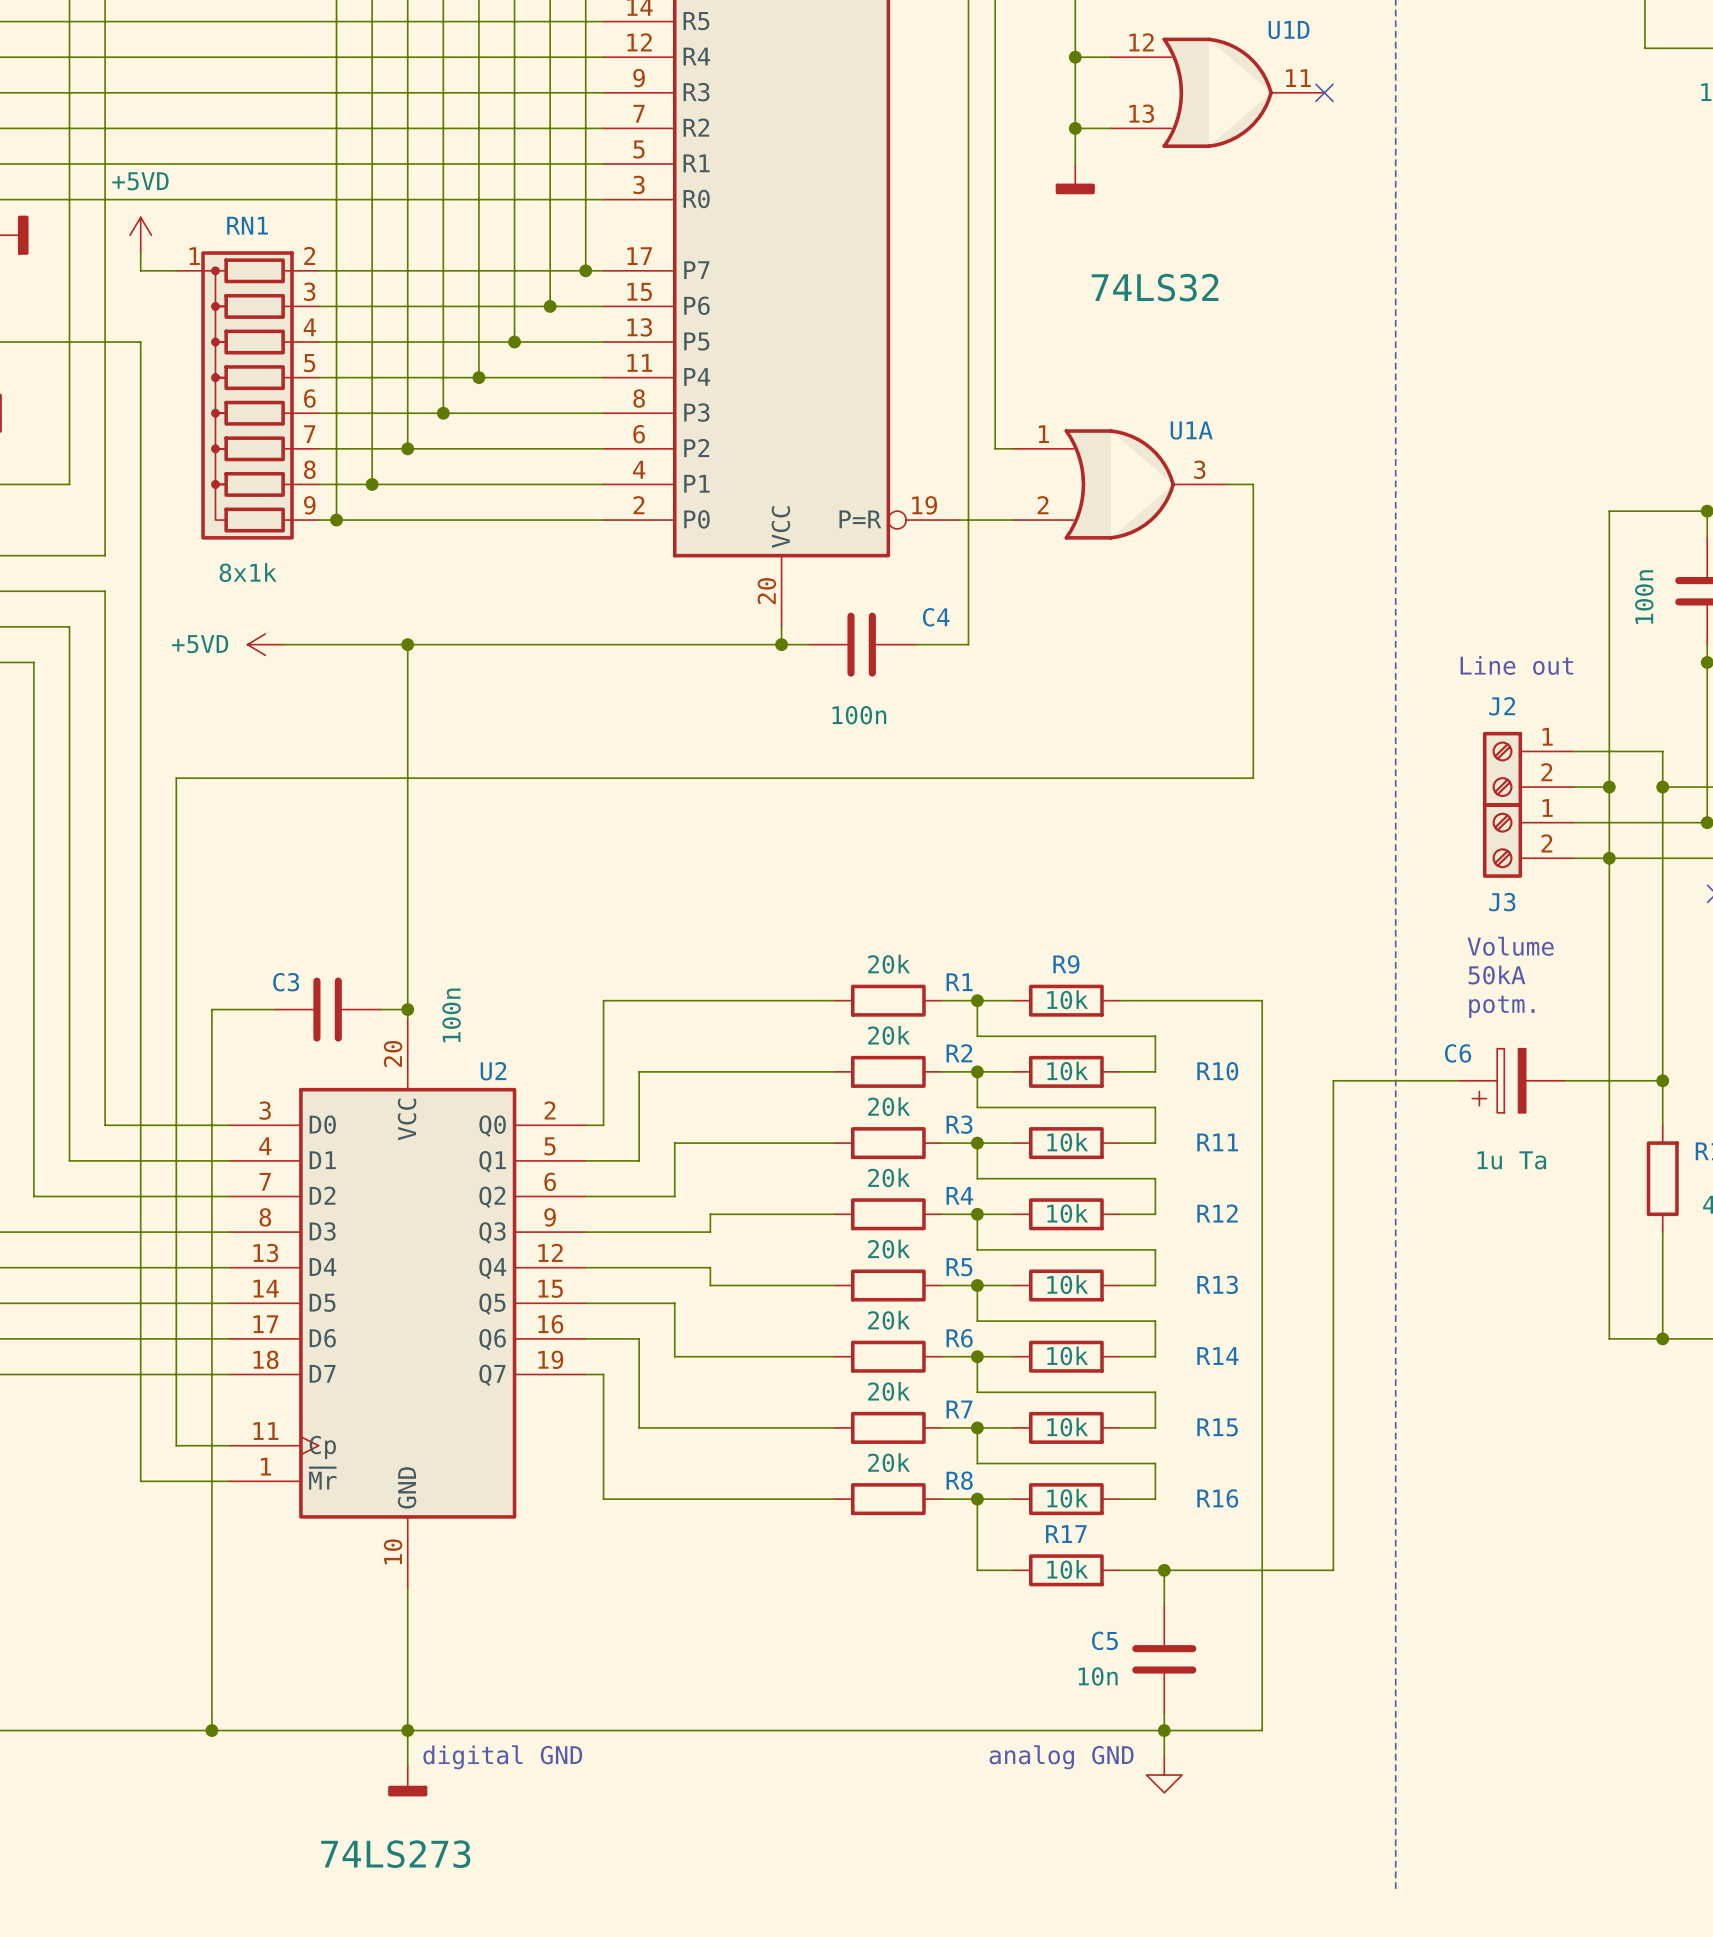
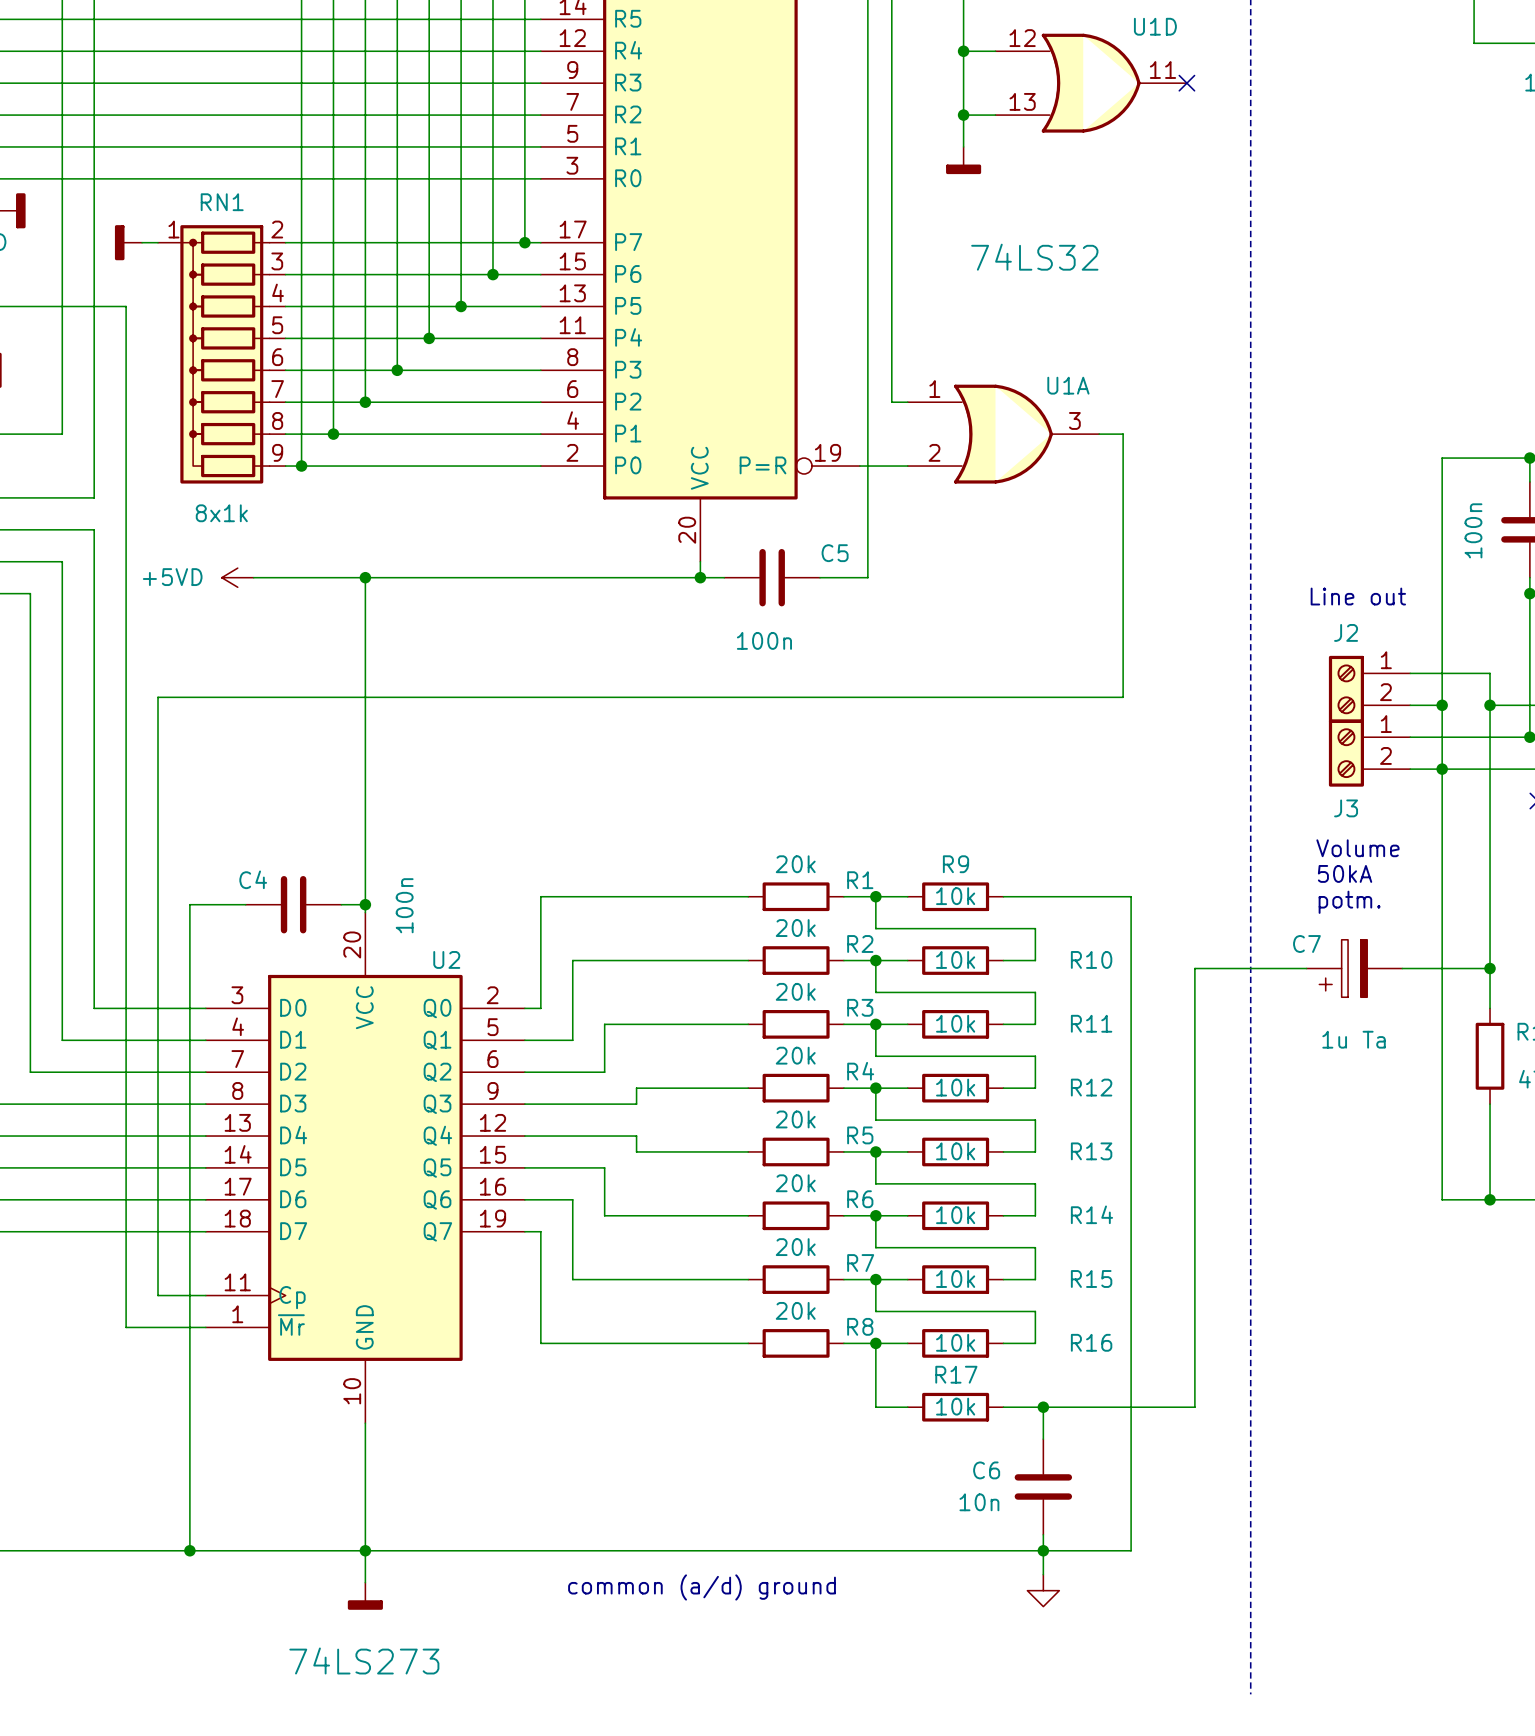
power symbol: +5VD (140, 235) -> none
power symbol: none -> (128, 242)
C4 name: C4 (936, 617) -> C5 (835, 553)
C3 name: C3 (286, 982) -> C4 (253, 879)
C6 name: C6 (1458, 1053) -> C7 (1306, 943)
C5 name: C5 (1104, 1640) -> C6 (986, 1470)
text: digital GND (502, 1757) -> none
text: analog GND (1061, 1757) -> none
text: none -> common (a/d) ground (702, 1587)

